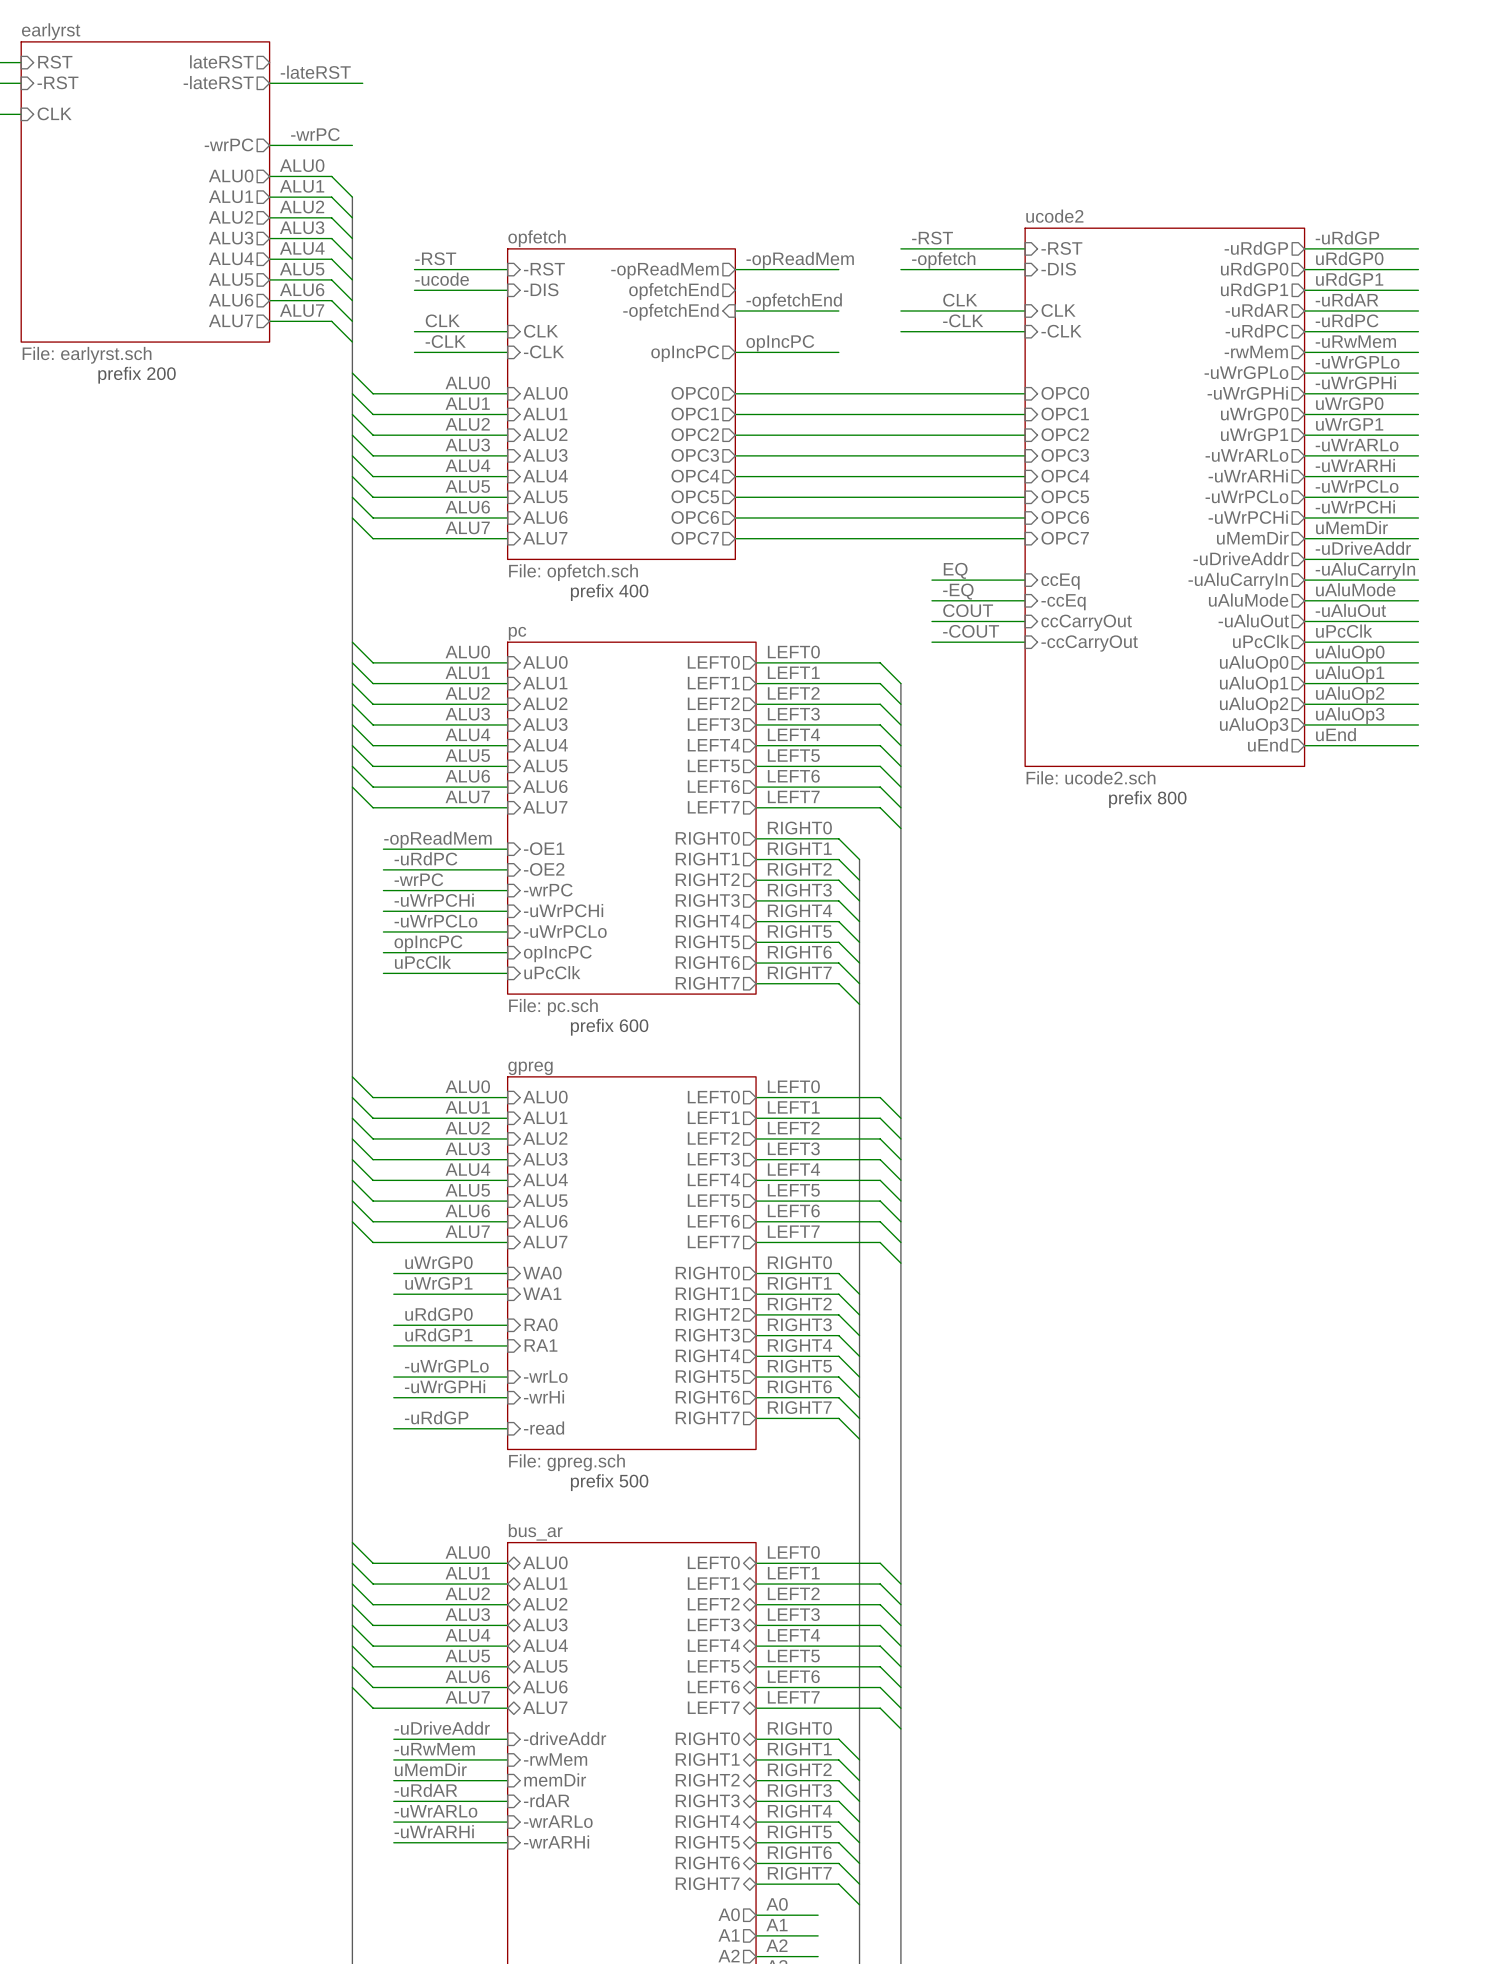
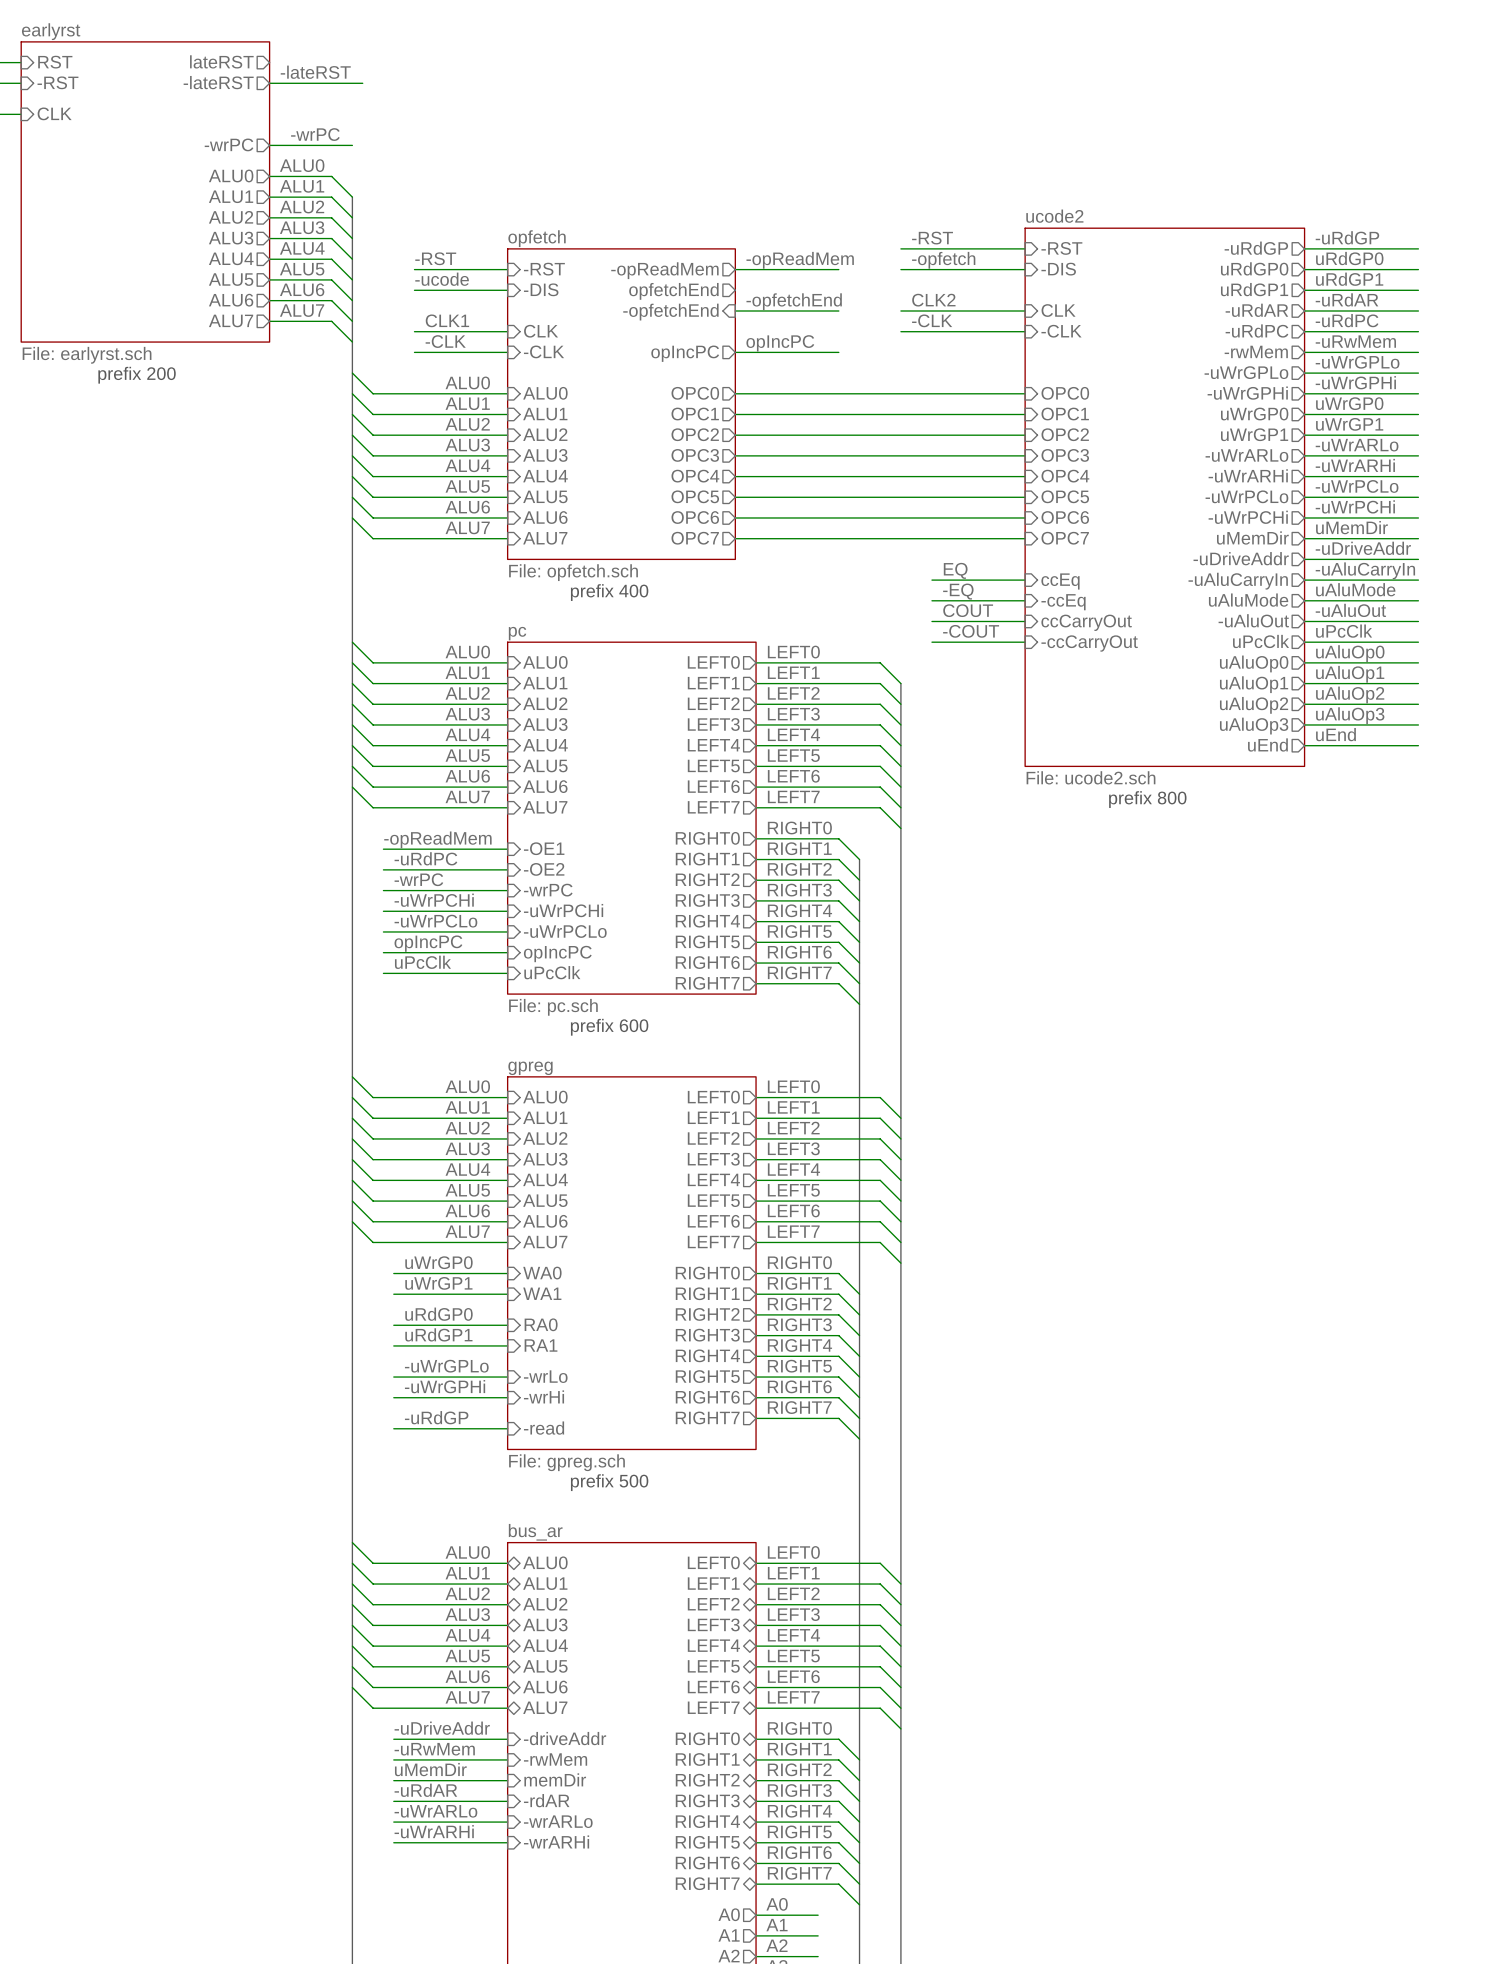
label: CLK (960, 300) -> CLK2 (933, 300)
label: CLK (442, 320) -> CLK1 (447, 320)
label position: -CLK (963, 320) -> -CLK (932, 320)

